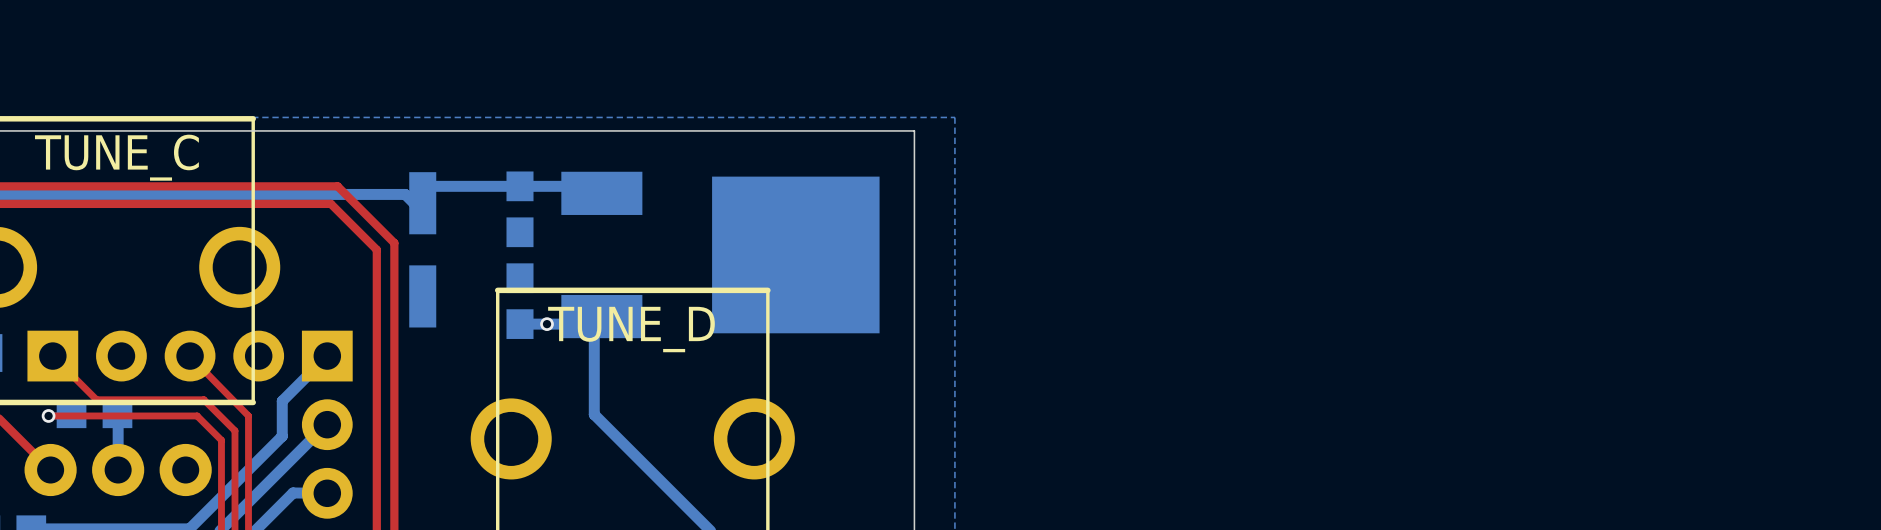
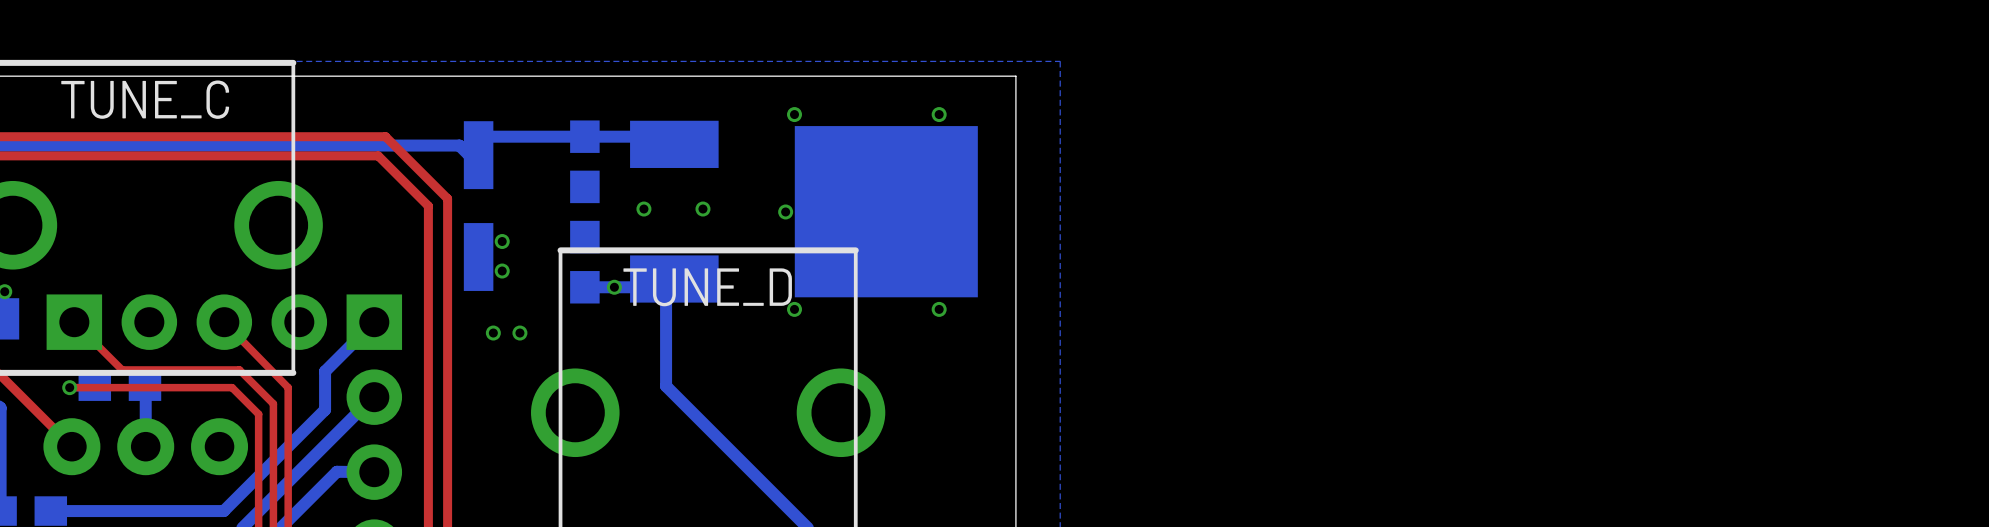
via: none -> (794, 114)
via: none -> (939, 114)
via: none -> (643, 209)
via: none -> (702, 209)
via: none -> (785, 211)
via: none -> (502, 241)
via: none -> (502, 271)
via: none -> (794, 309)
via: none -> (939, 309)
via: none -> (493, 333)
via: none -> (519, 333)

